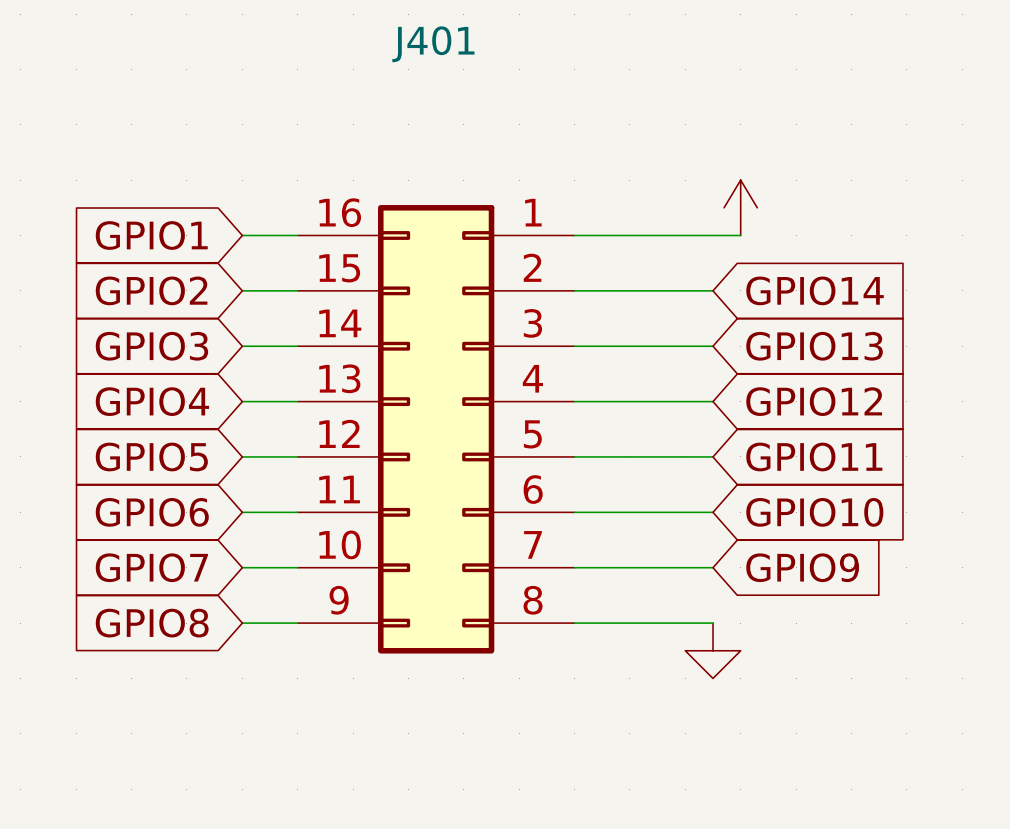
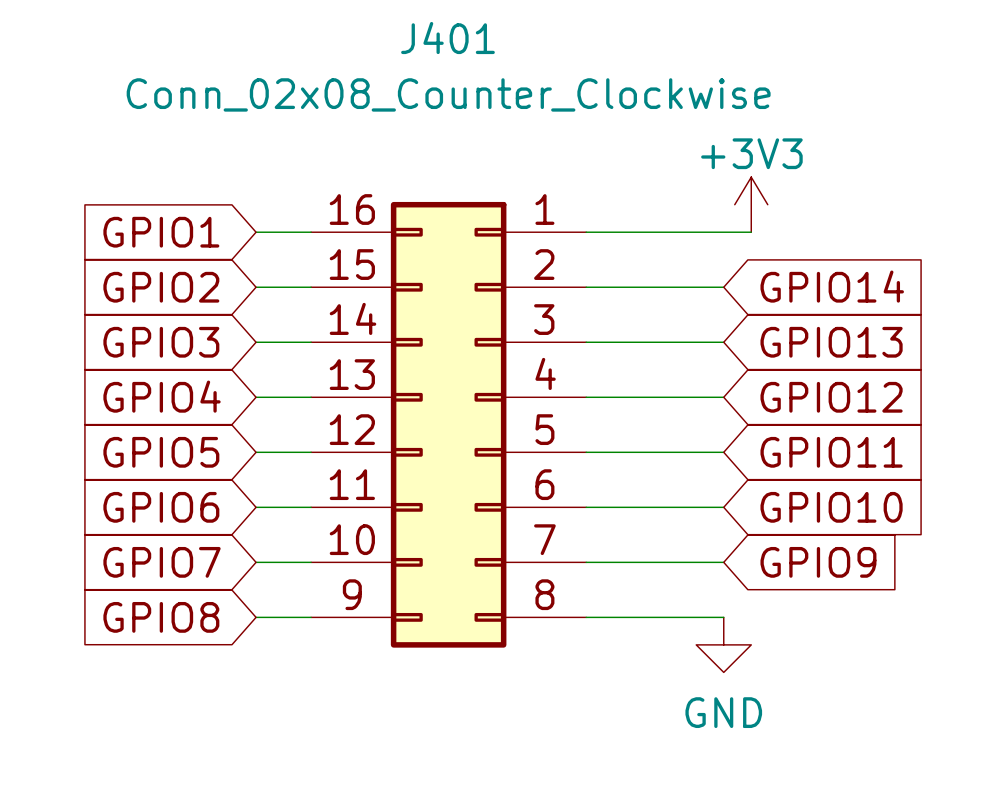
J401 value: none -> Conn_02x08_Counter_Clockwise (448, 94)
power symbol text: none -> +3V3 (751, 153)
power symbol text: none -> GND (723, 712)

